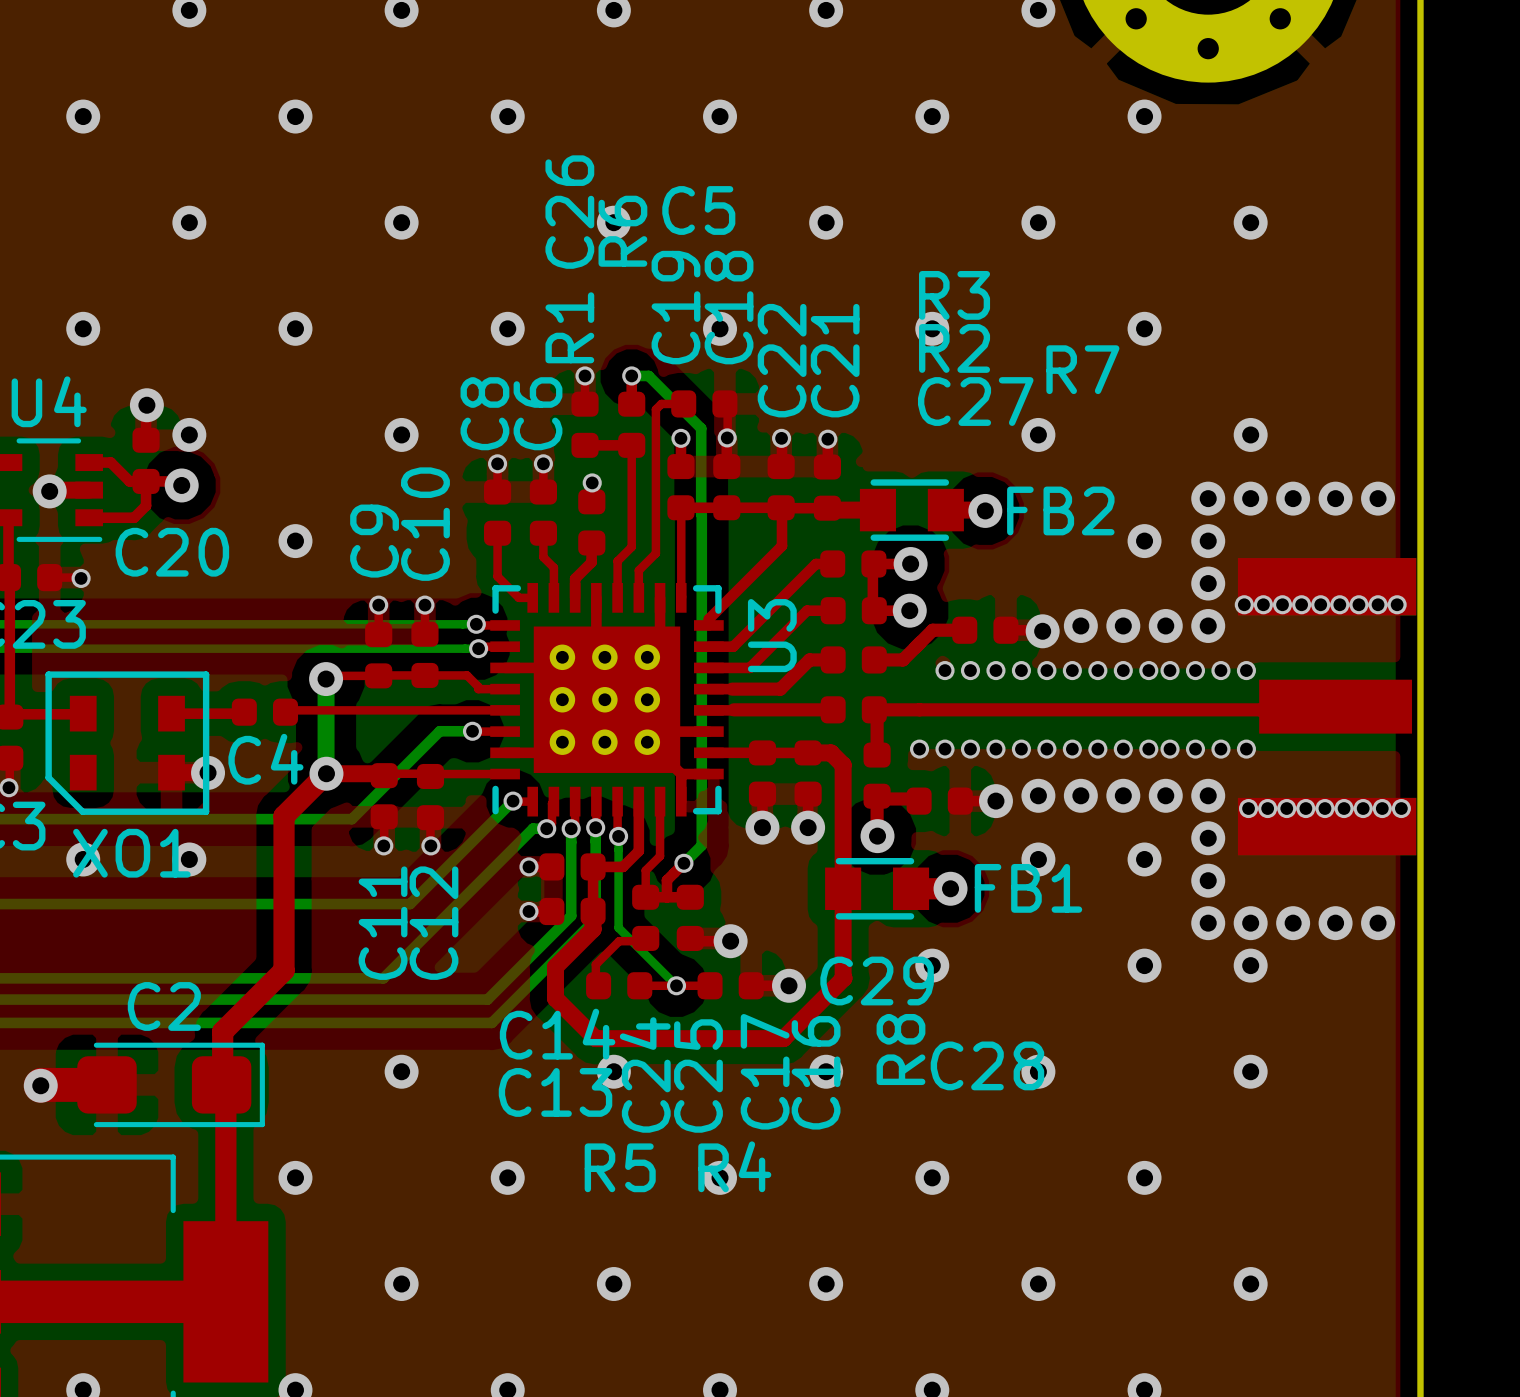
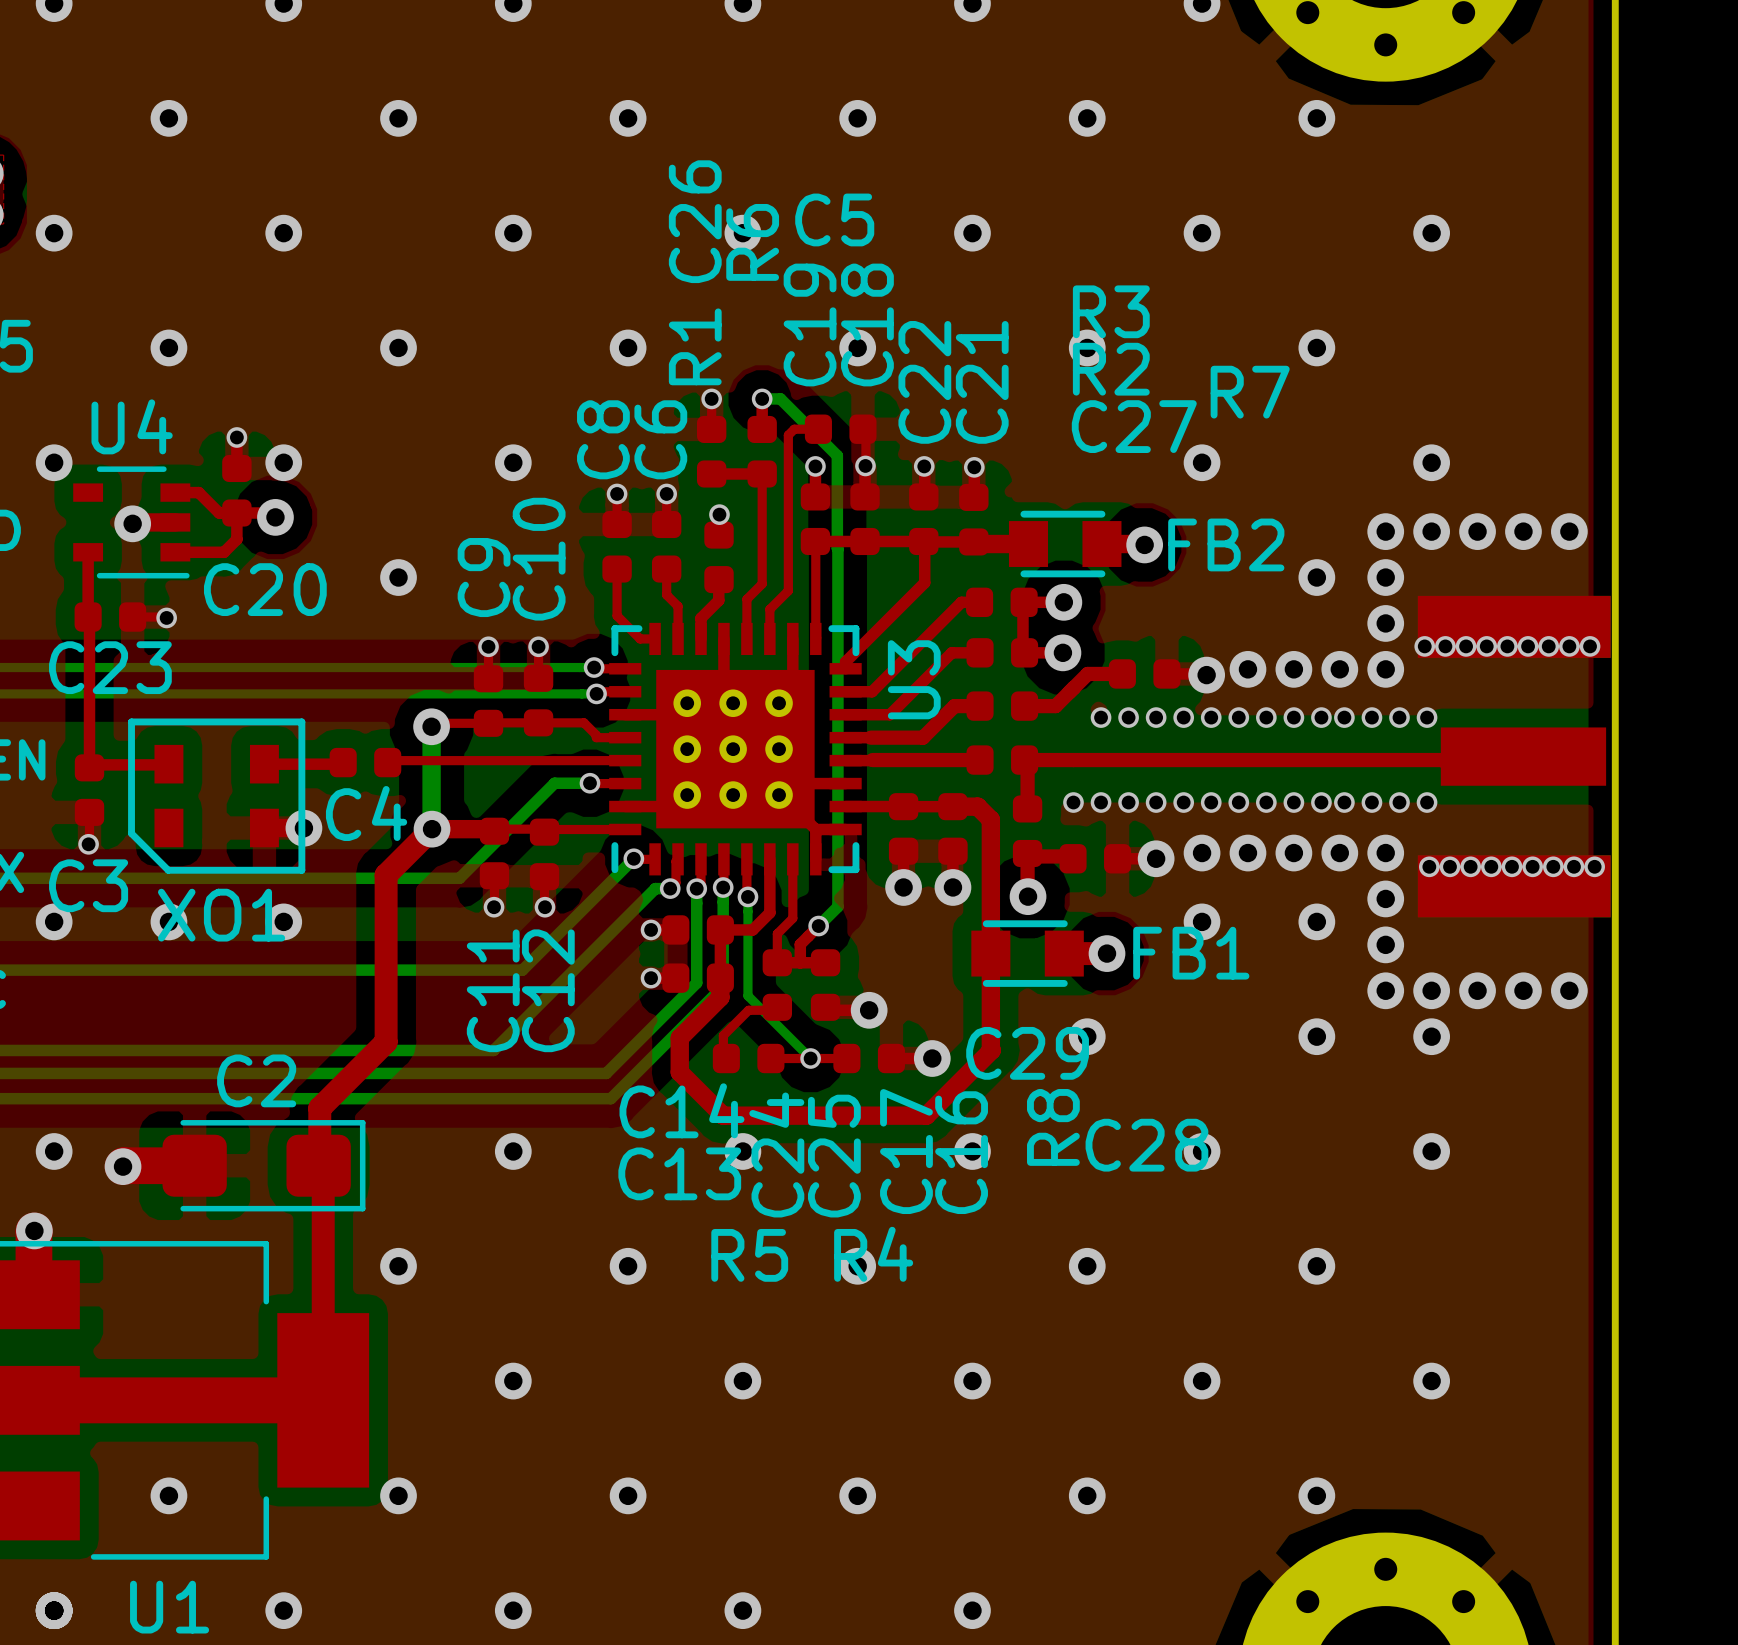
via size: [129, 388, 164, 423] -> [226, 427, 248, 448]

